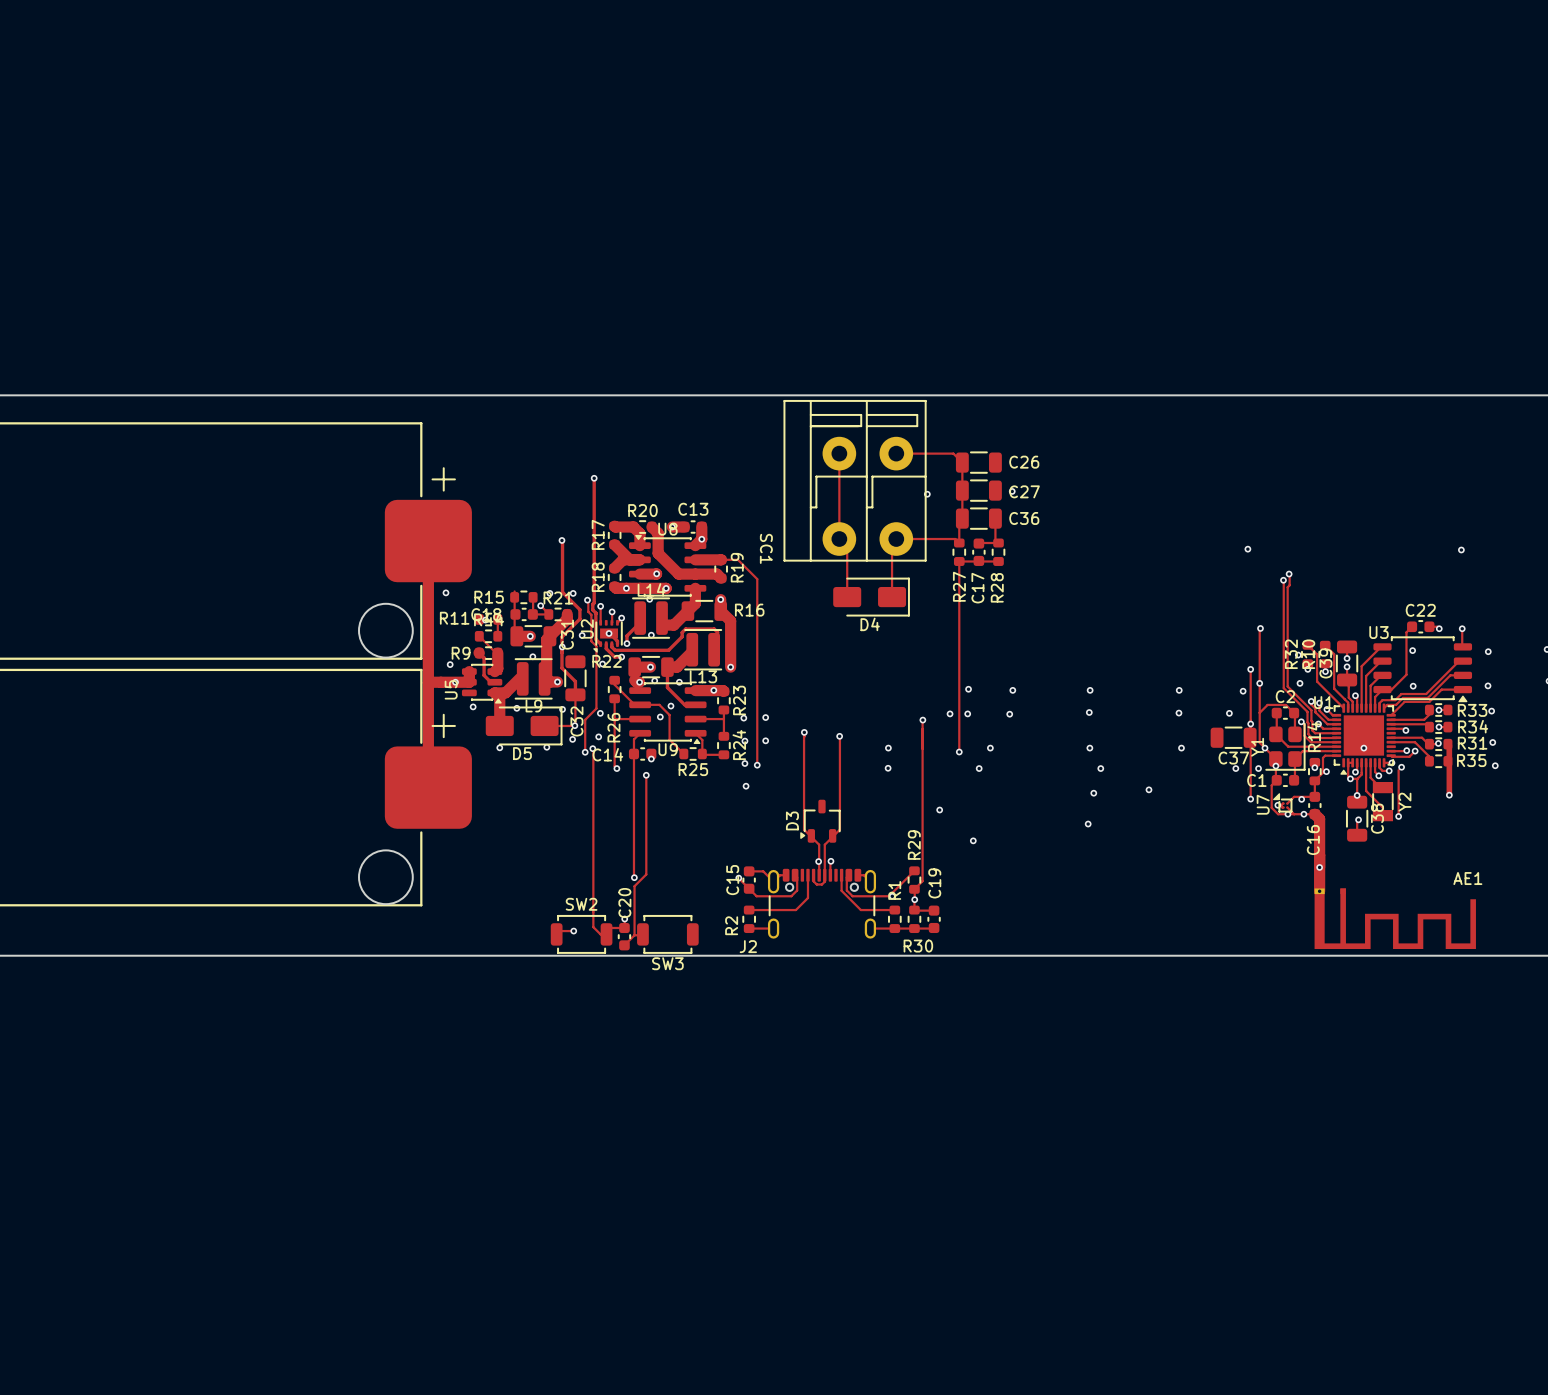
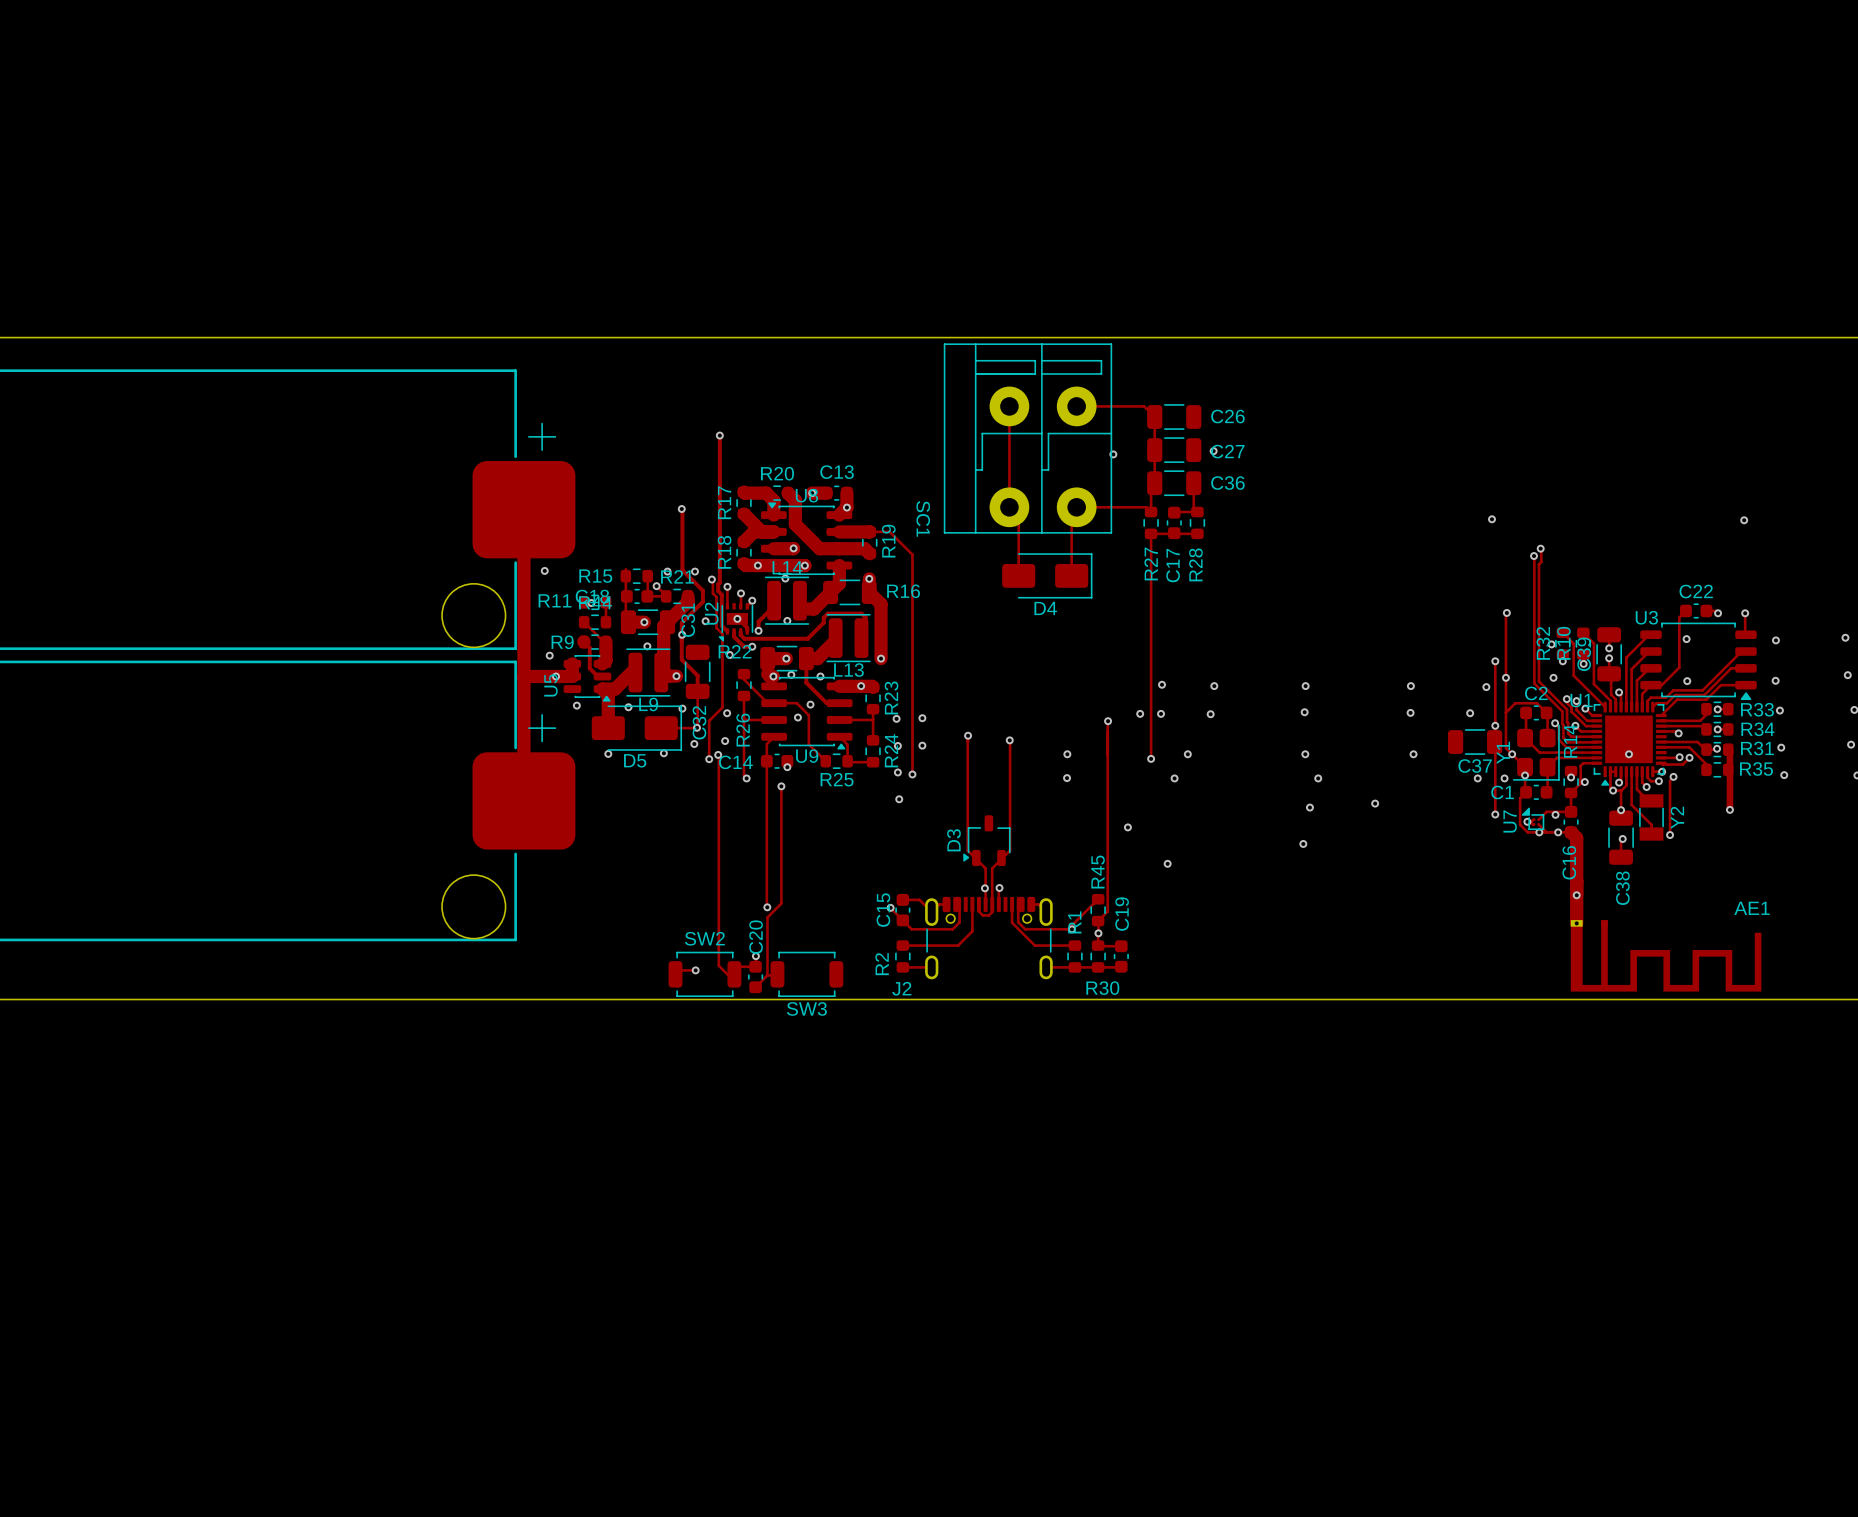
C38 name position: C38 (1377, 818) -> C38 (1622, 888)
R29 name: R29 (914, 845) -> R45 (1098, 872)

